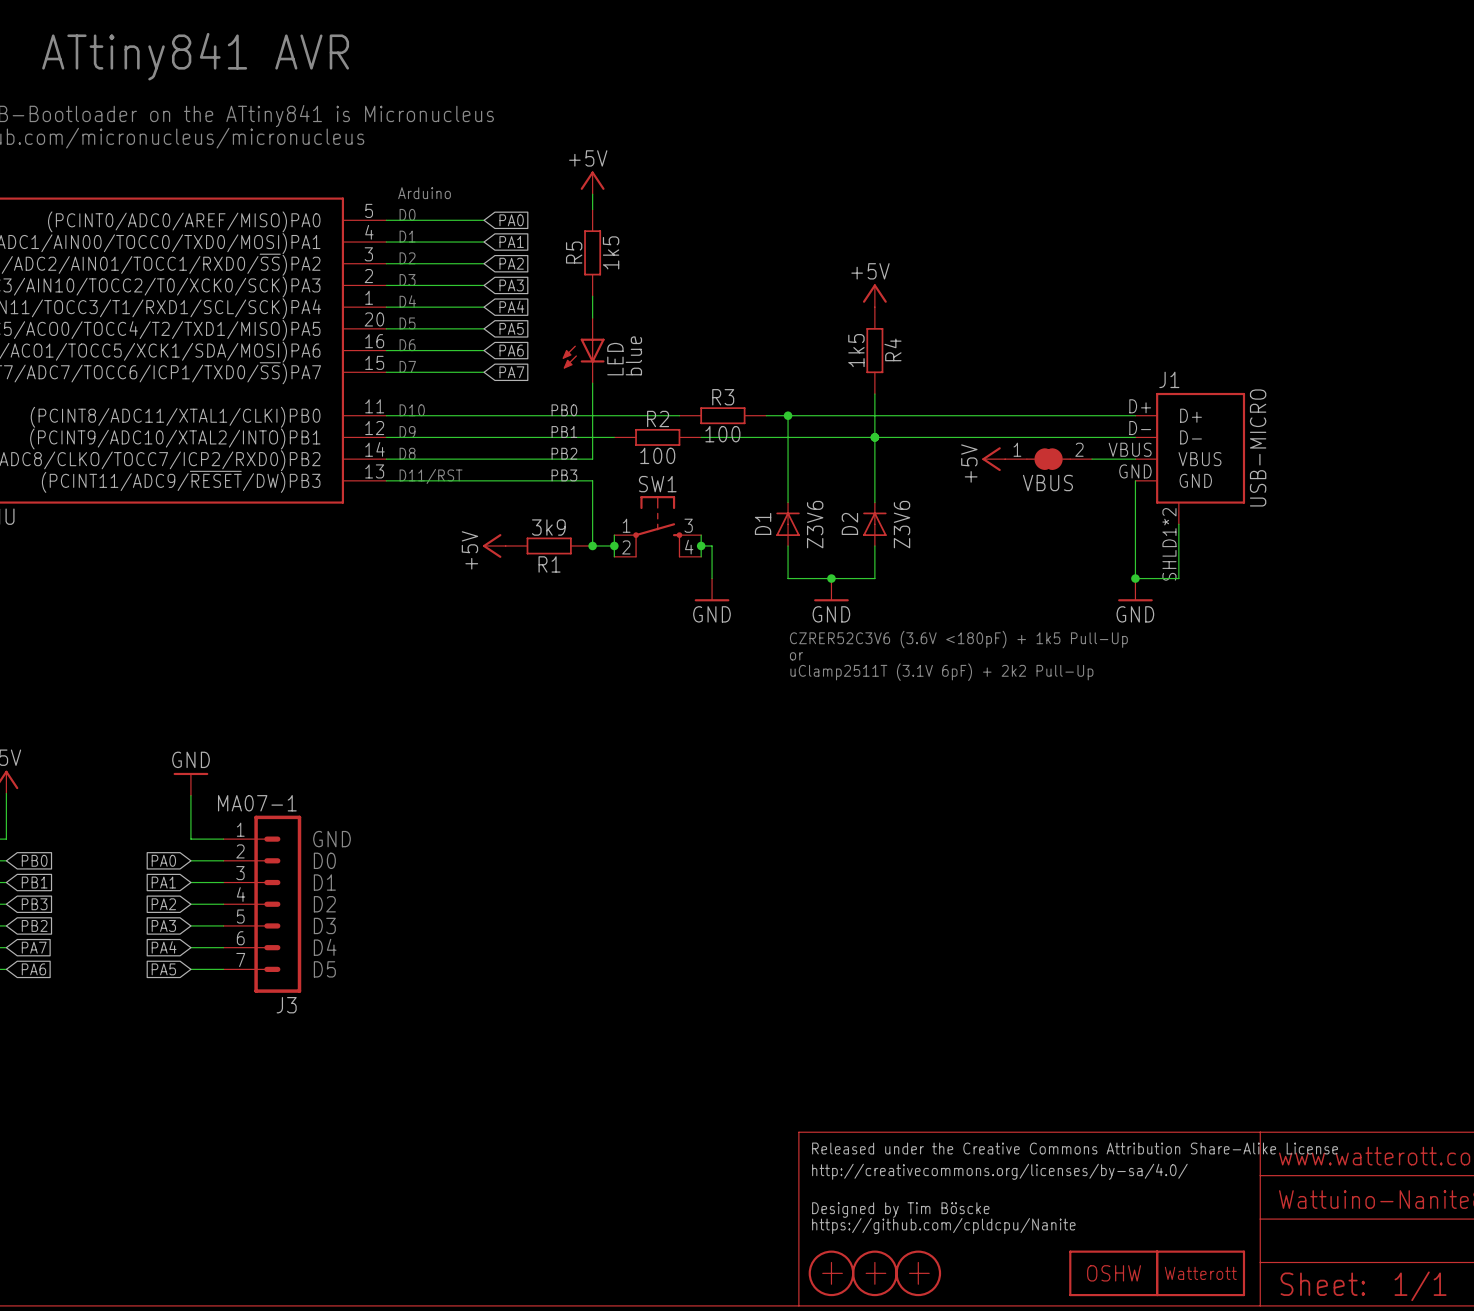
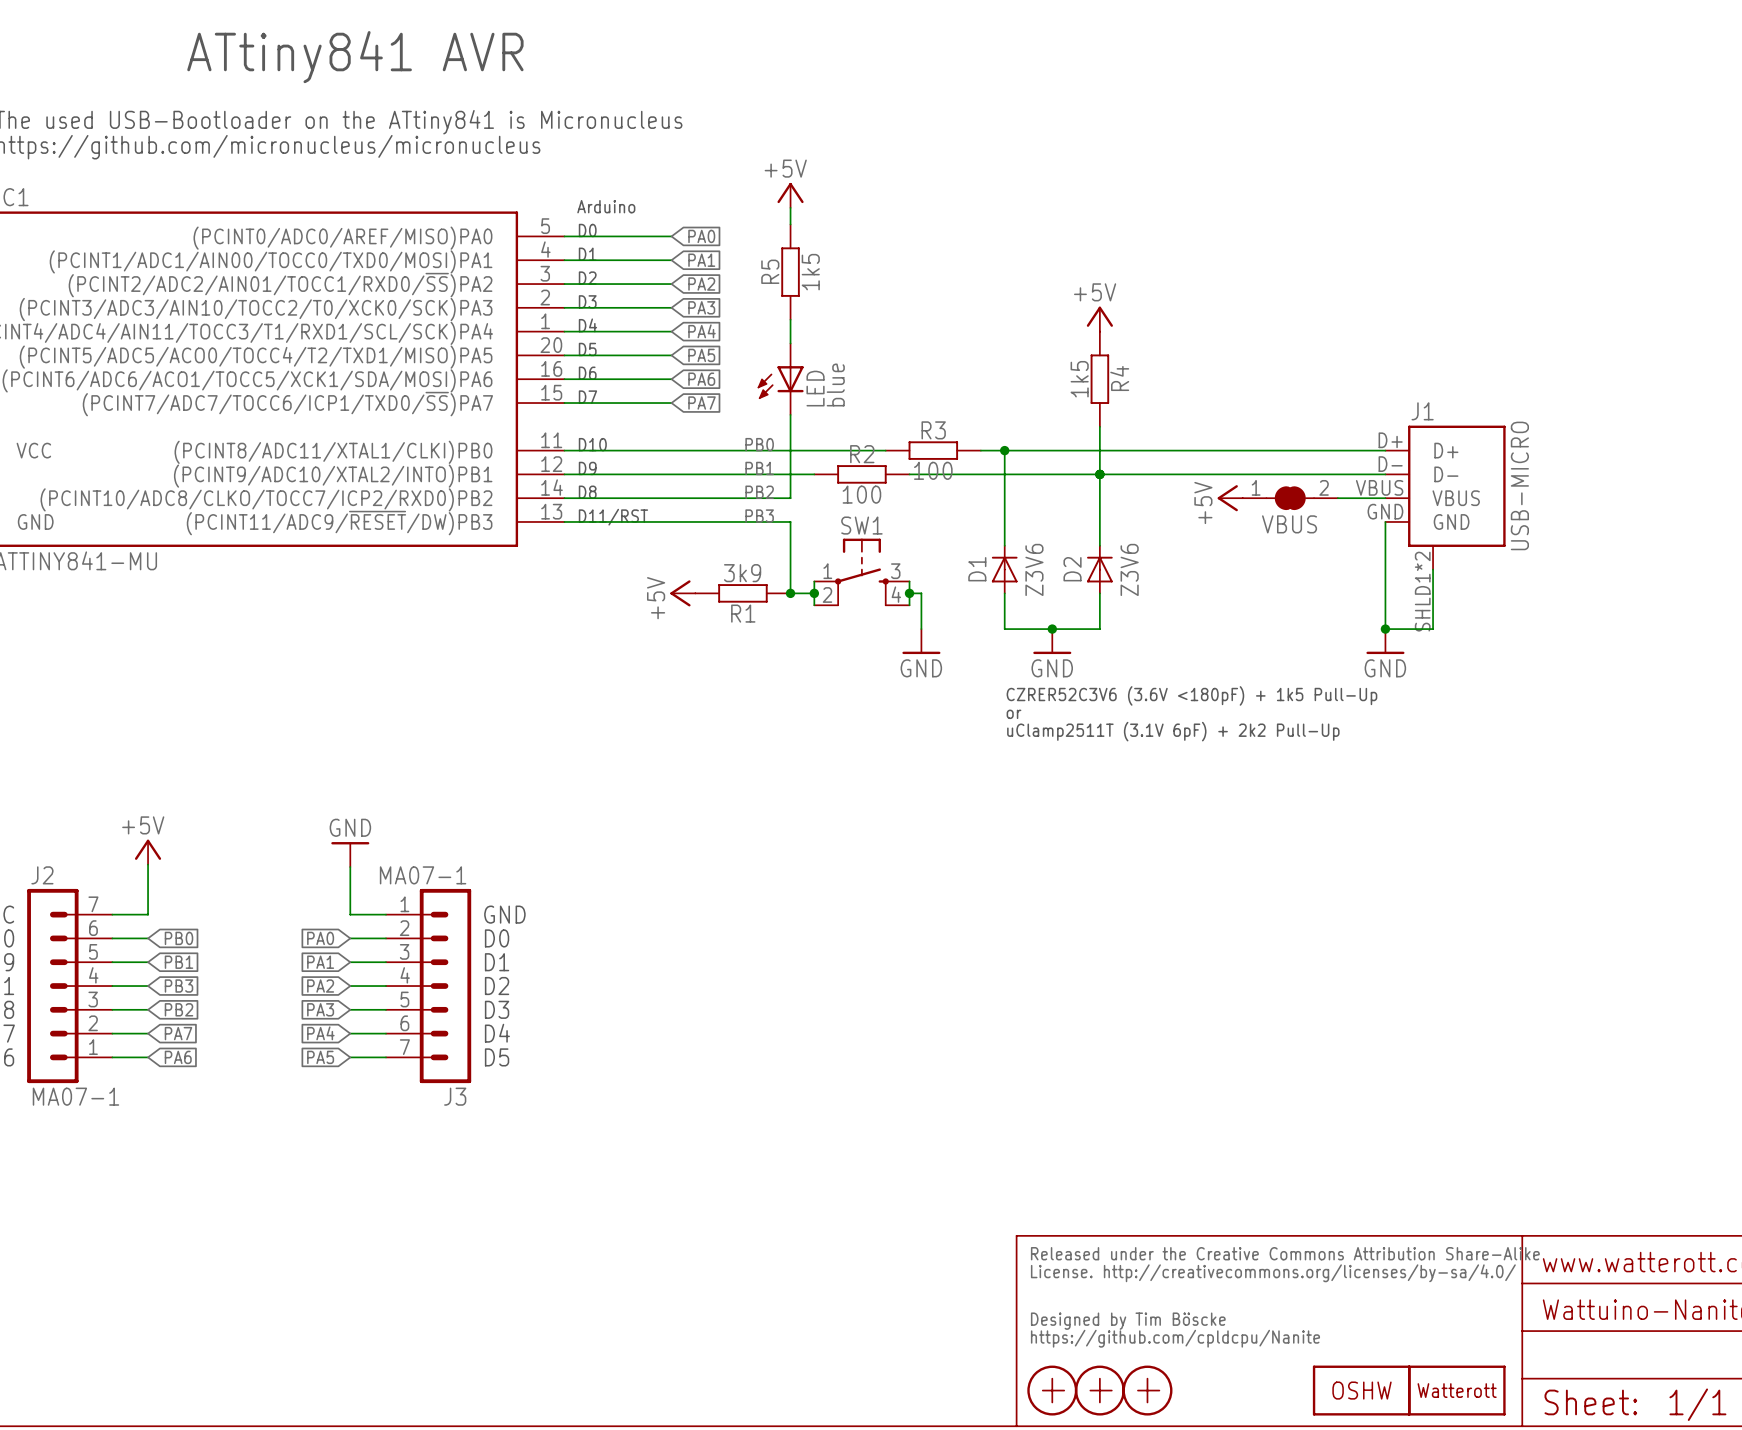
text: Released under the Creative Commons Attribution Share-Alike License (1075, 1148) -> License. http://creativecommons.org/licenses/by-sa/4.0/ (1273, 1273)
text: http://creativecommons.org/licenses/by-sa/4.0/ (999, 1171) -> none

